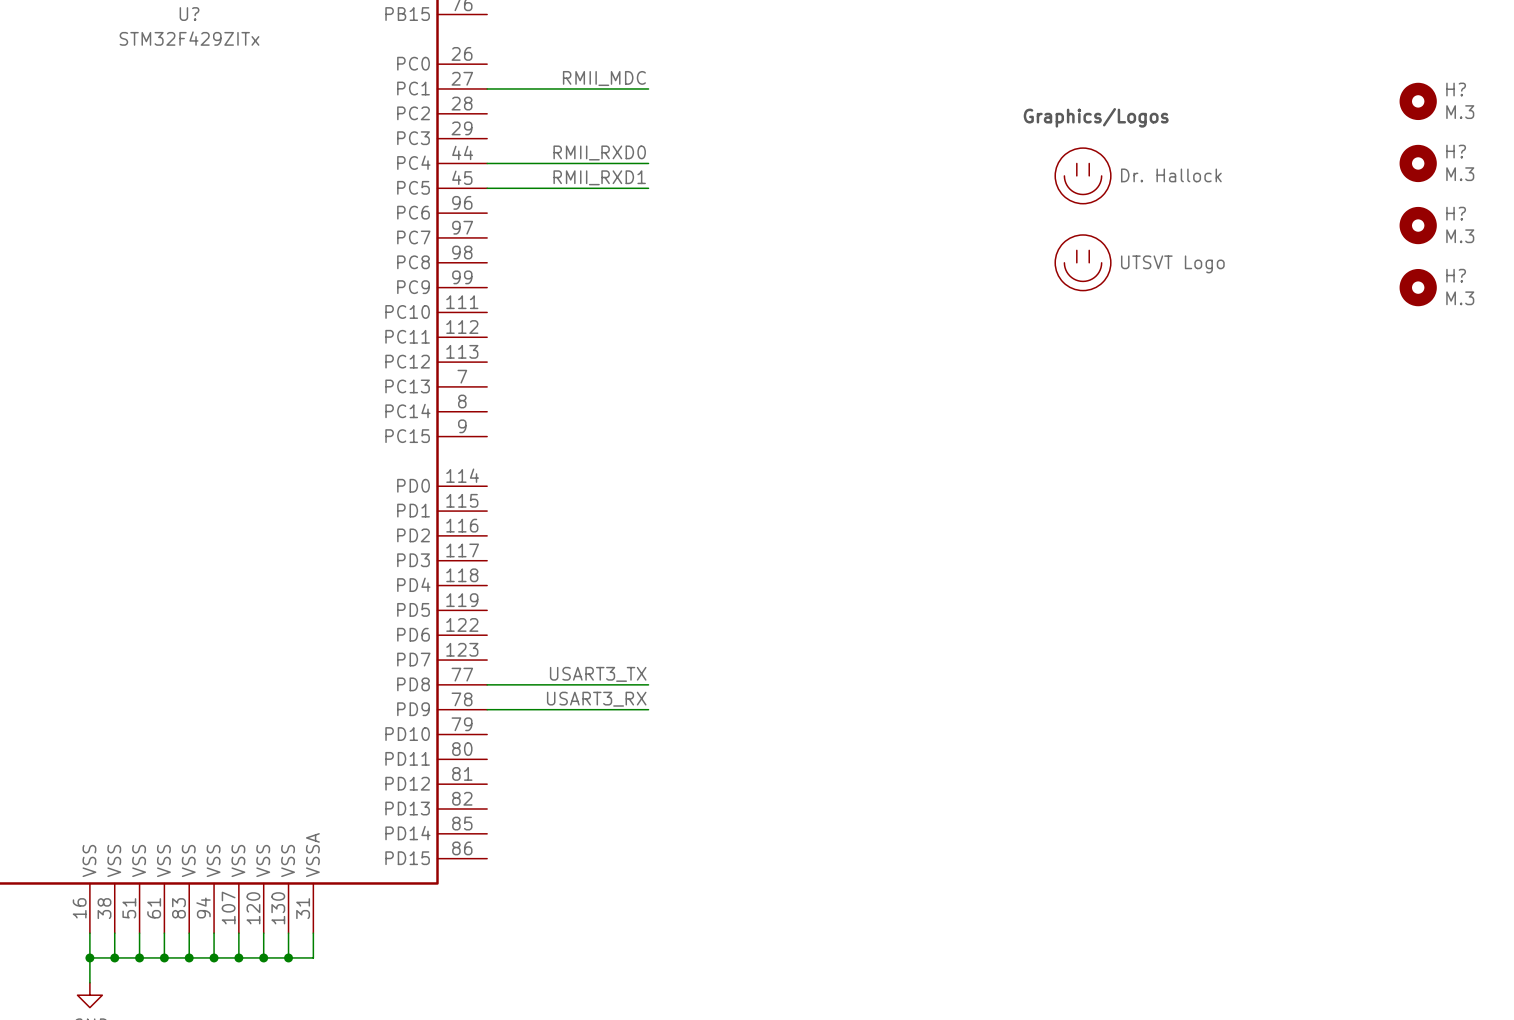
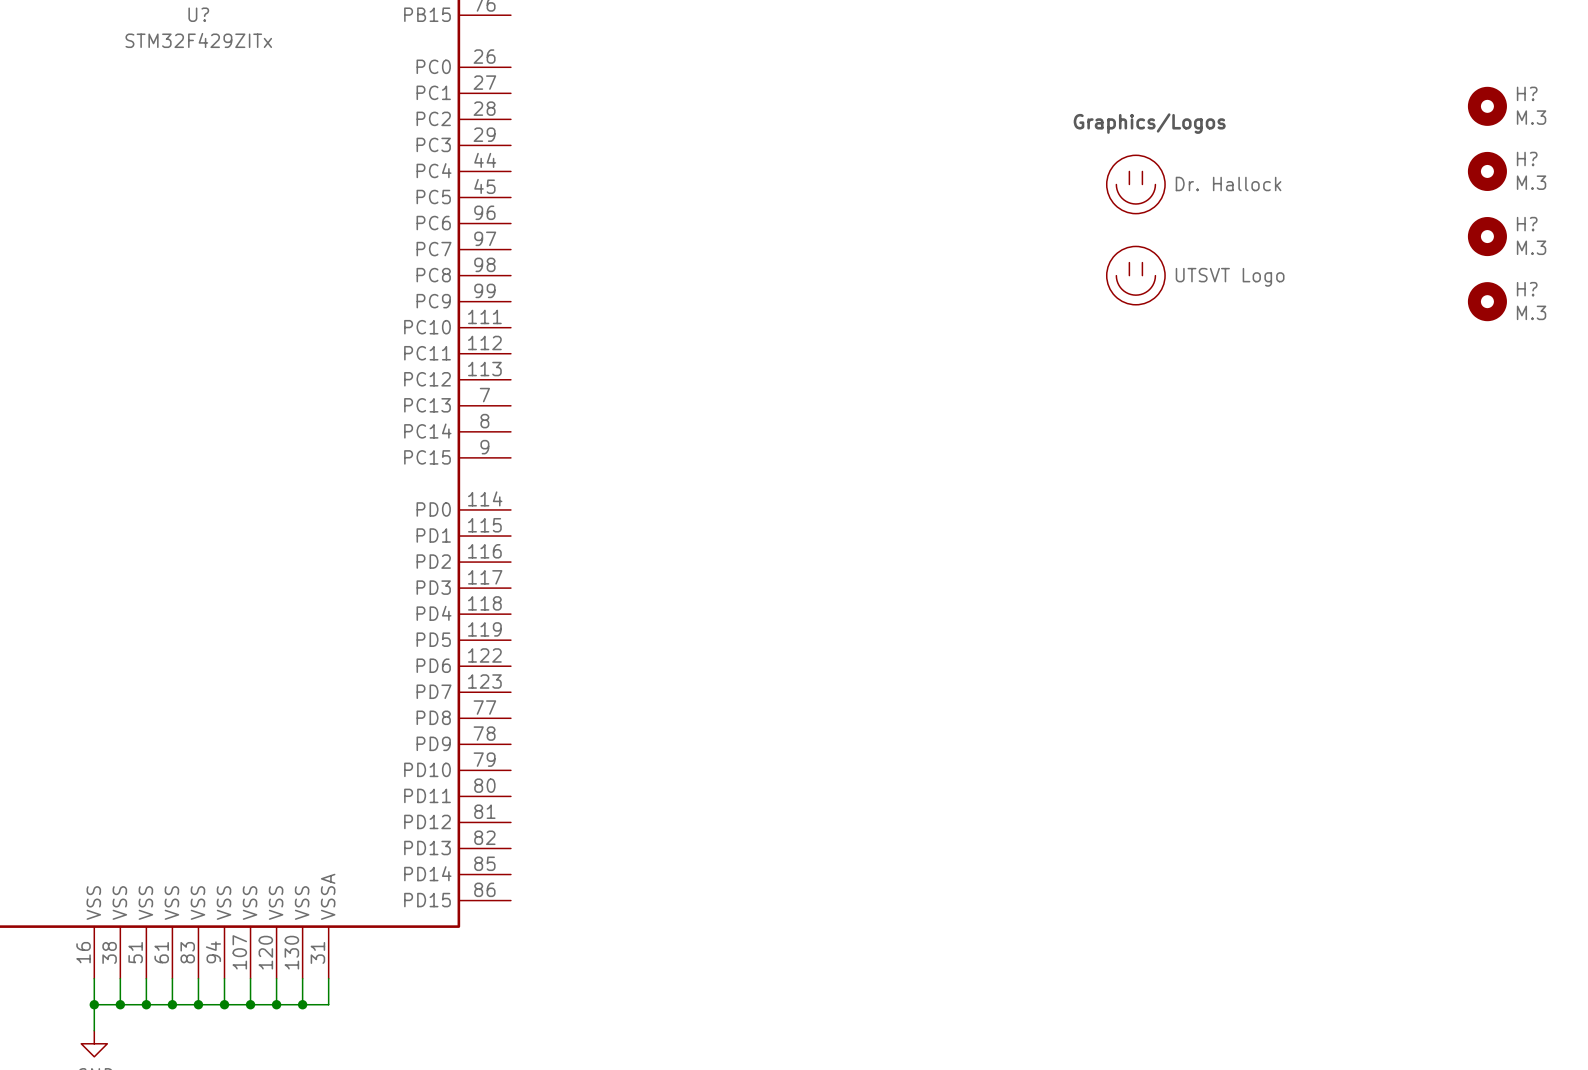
label: RMII_MDC (604, 78) -> none
wire: (487, 88) (648, 88) -> none
label: RMII_RXD0 (599, 152) -> none
wire: (487, 163) (648, 163) -> none
label: RMII_RXD1 (599, 177) -> none
wire: (487, 188) (648, 188) -> none
label: USART3_TX (598, 674) -> none
wire: (487, 684) (648, 684) -> none
label: USART3_RX (596, 699) -> none
wire: (487, 709) (648, 709) -> none

